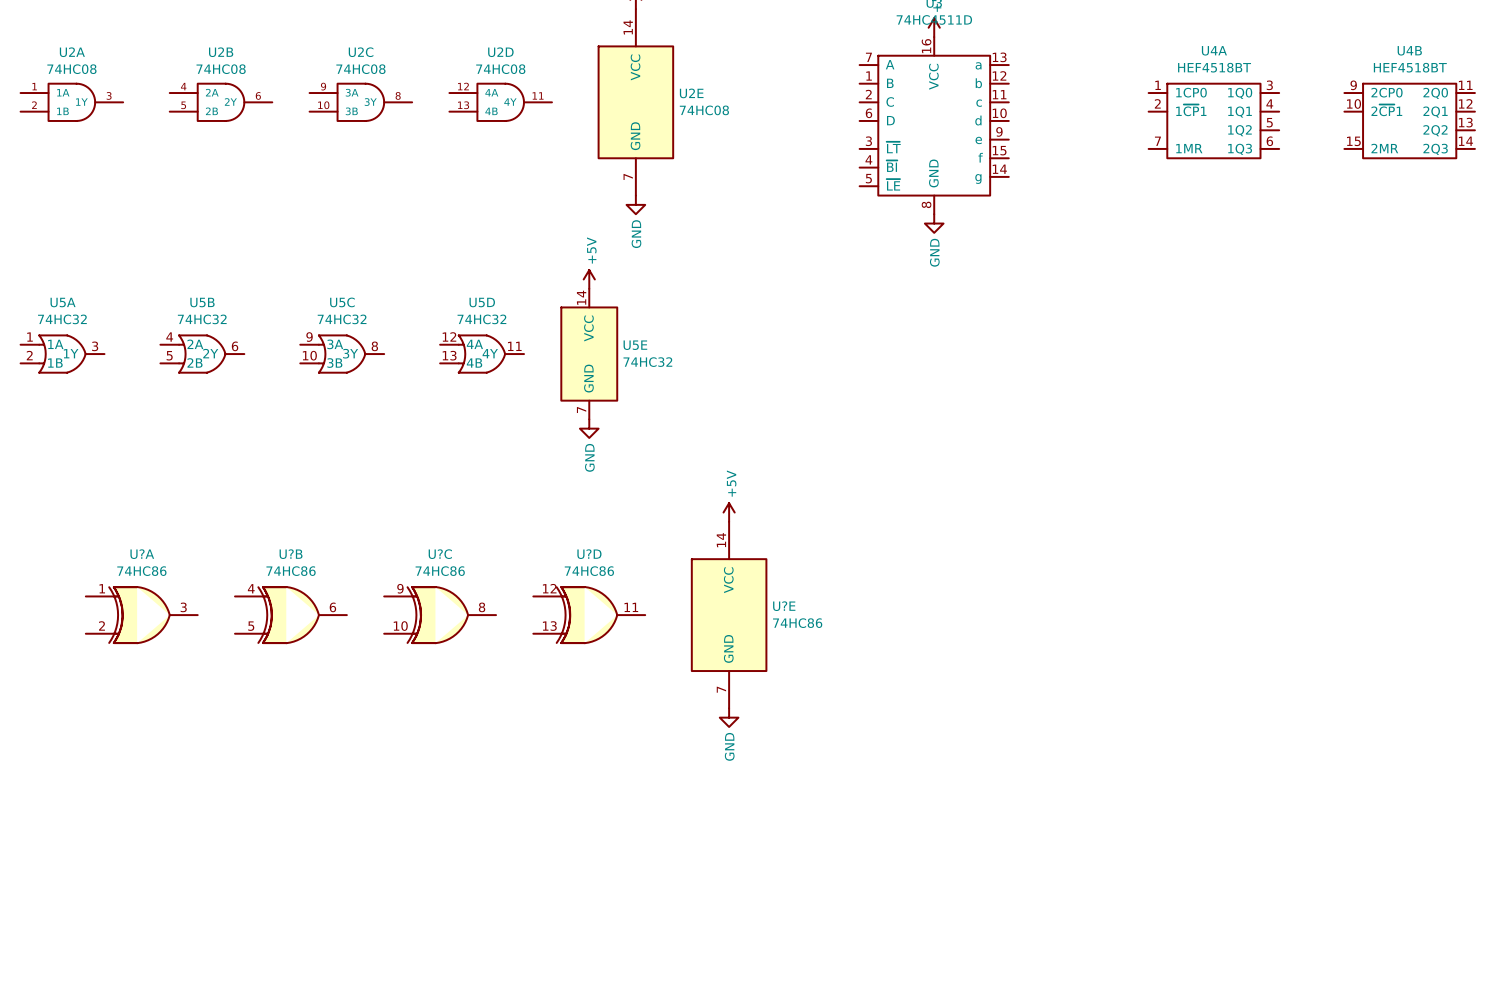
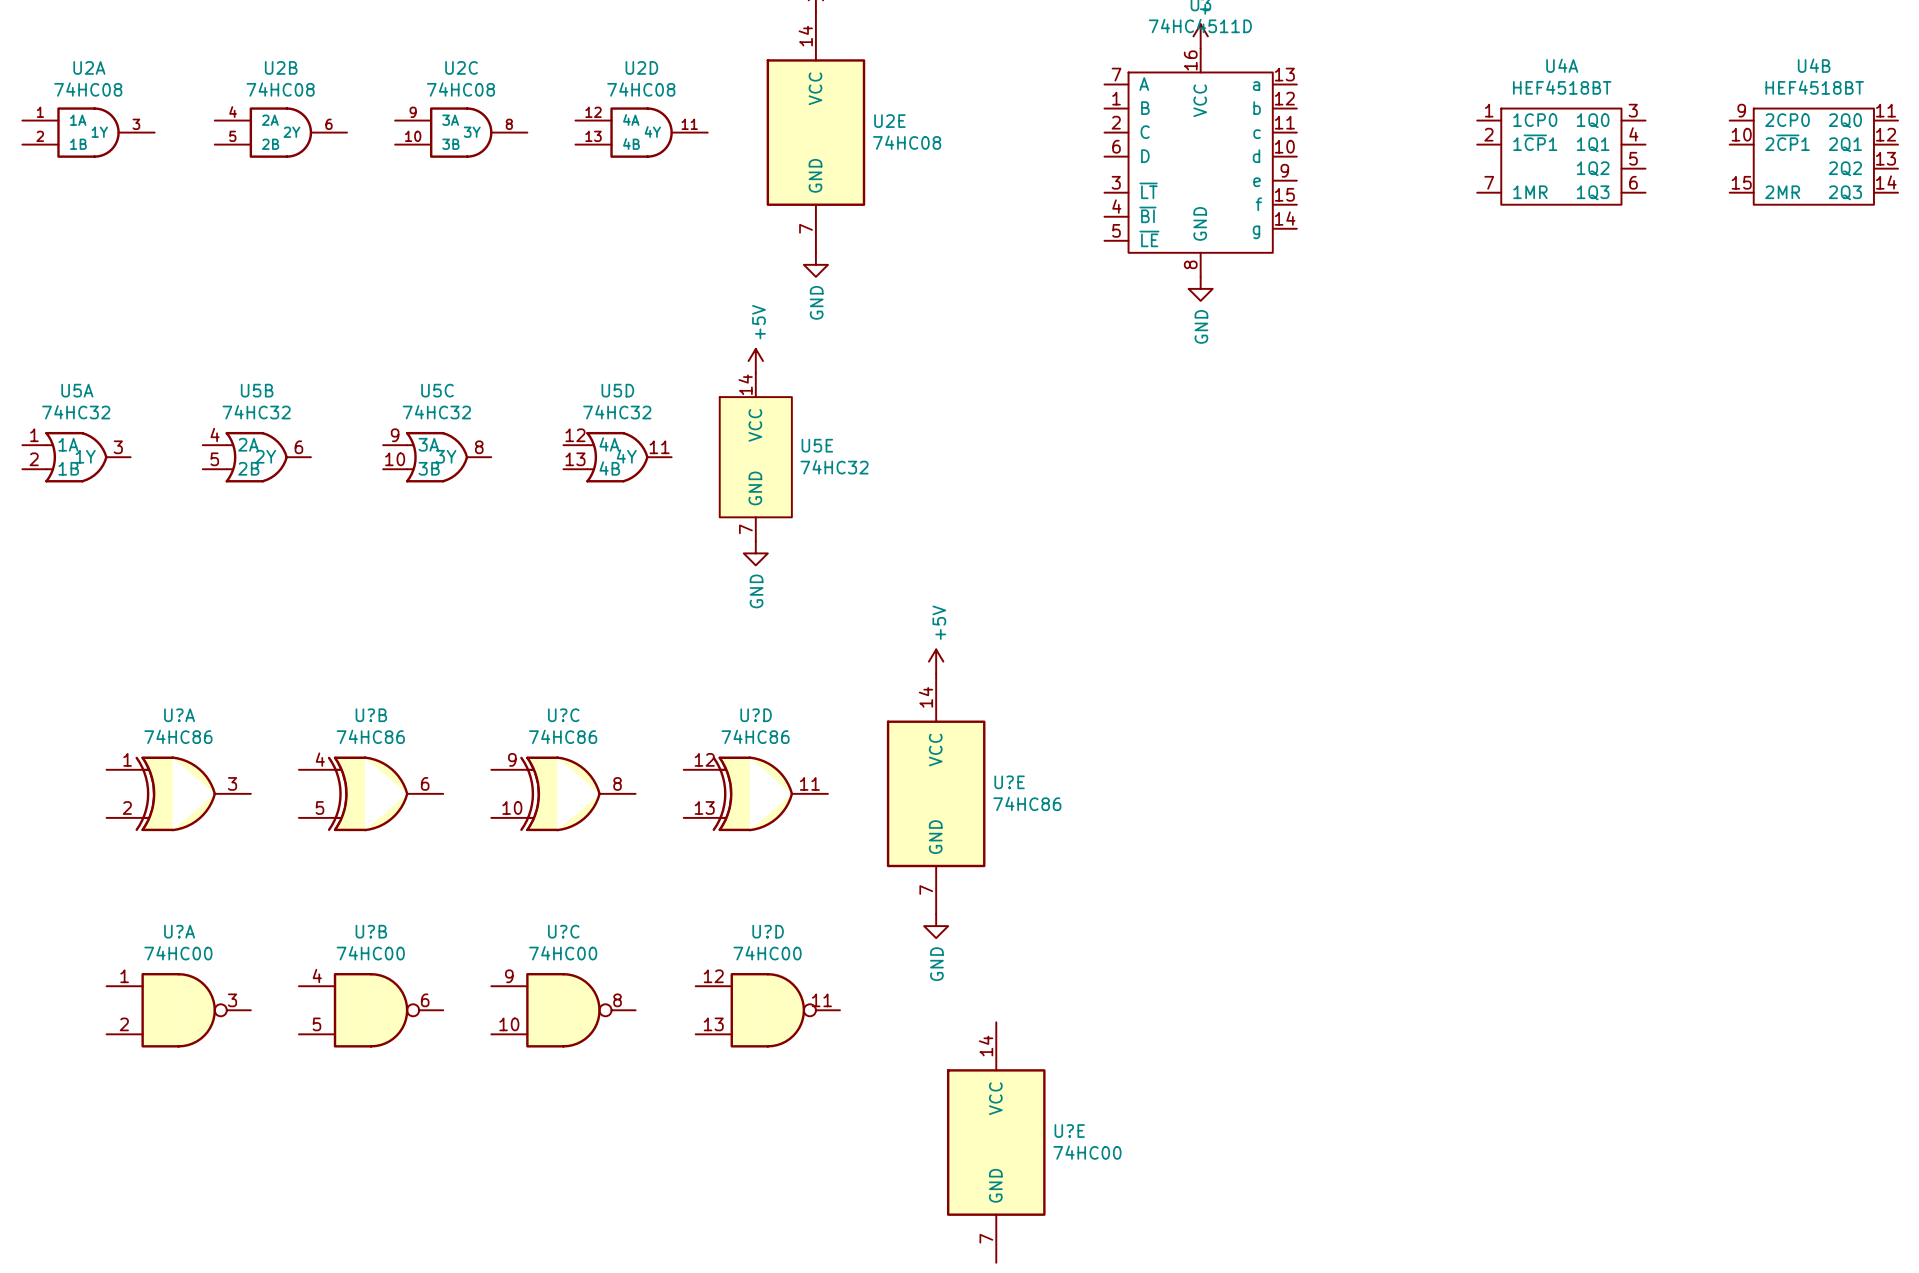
U?A: none -> 74HC00 (178, 1010)
U?B: none -> 74HC00 (371, 1010)
U?C: none -> 74HC00 (563, 1010)
U?D: none -> 74HC00 (767, 1010)
U?E: none -> 74HC00 (996, 1142)

